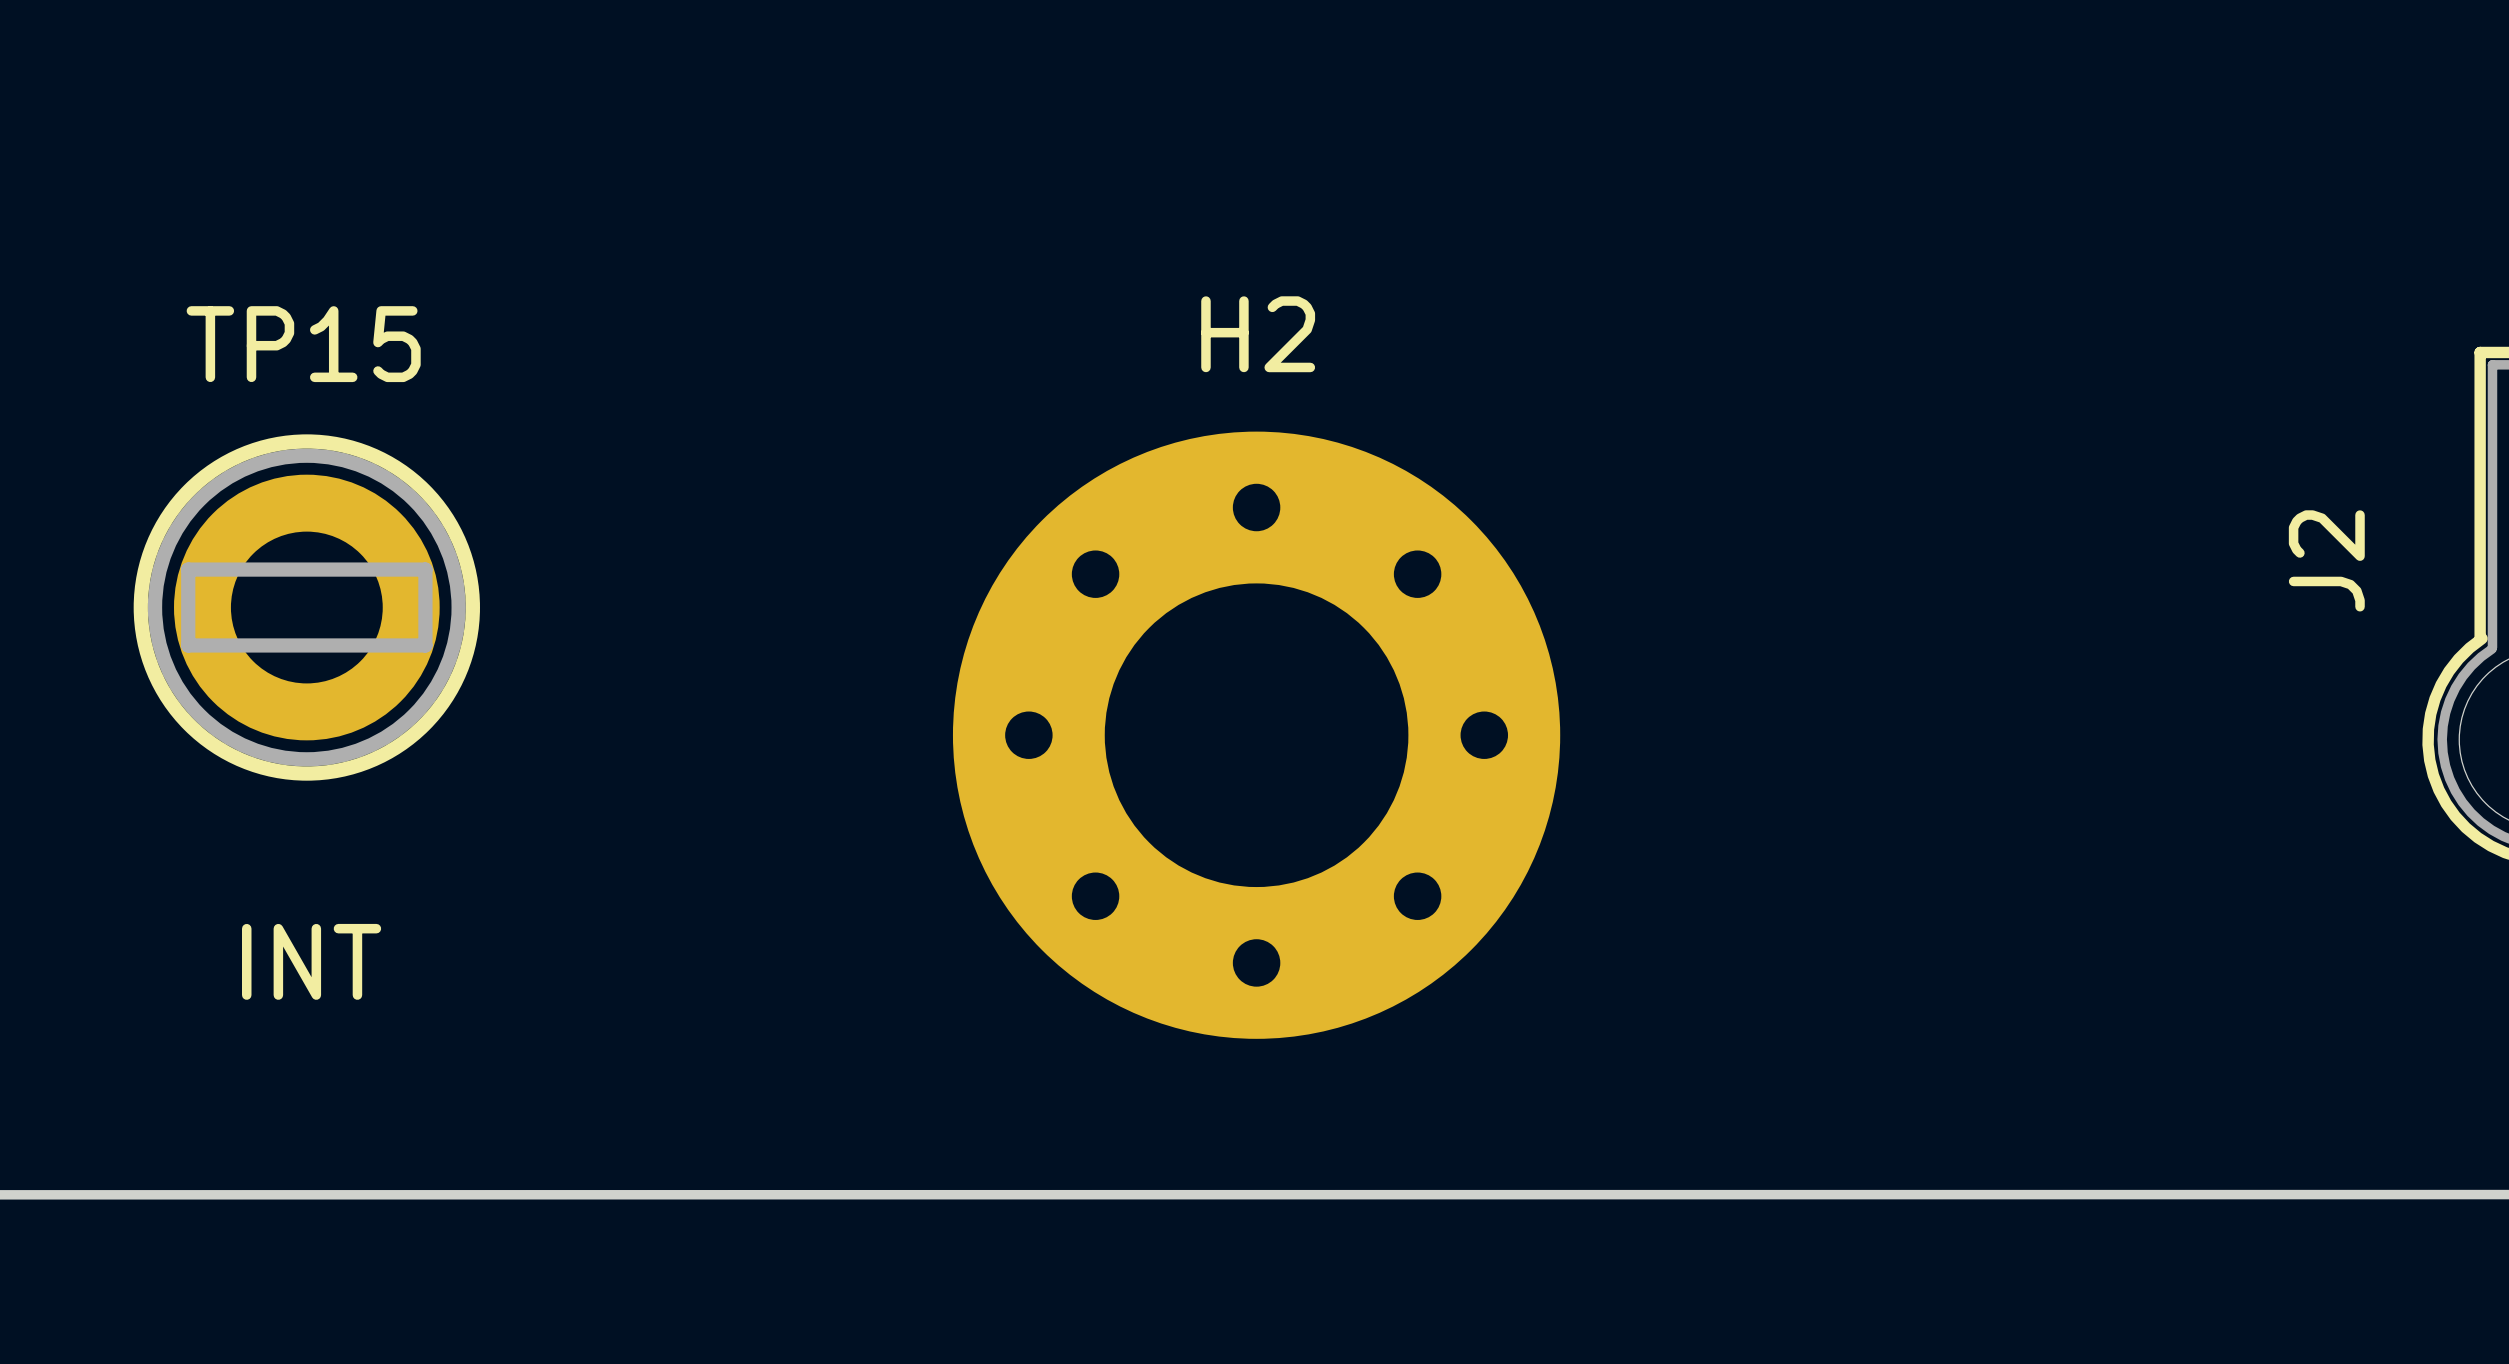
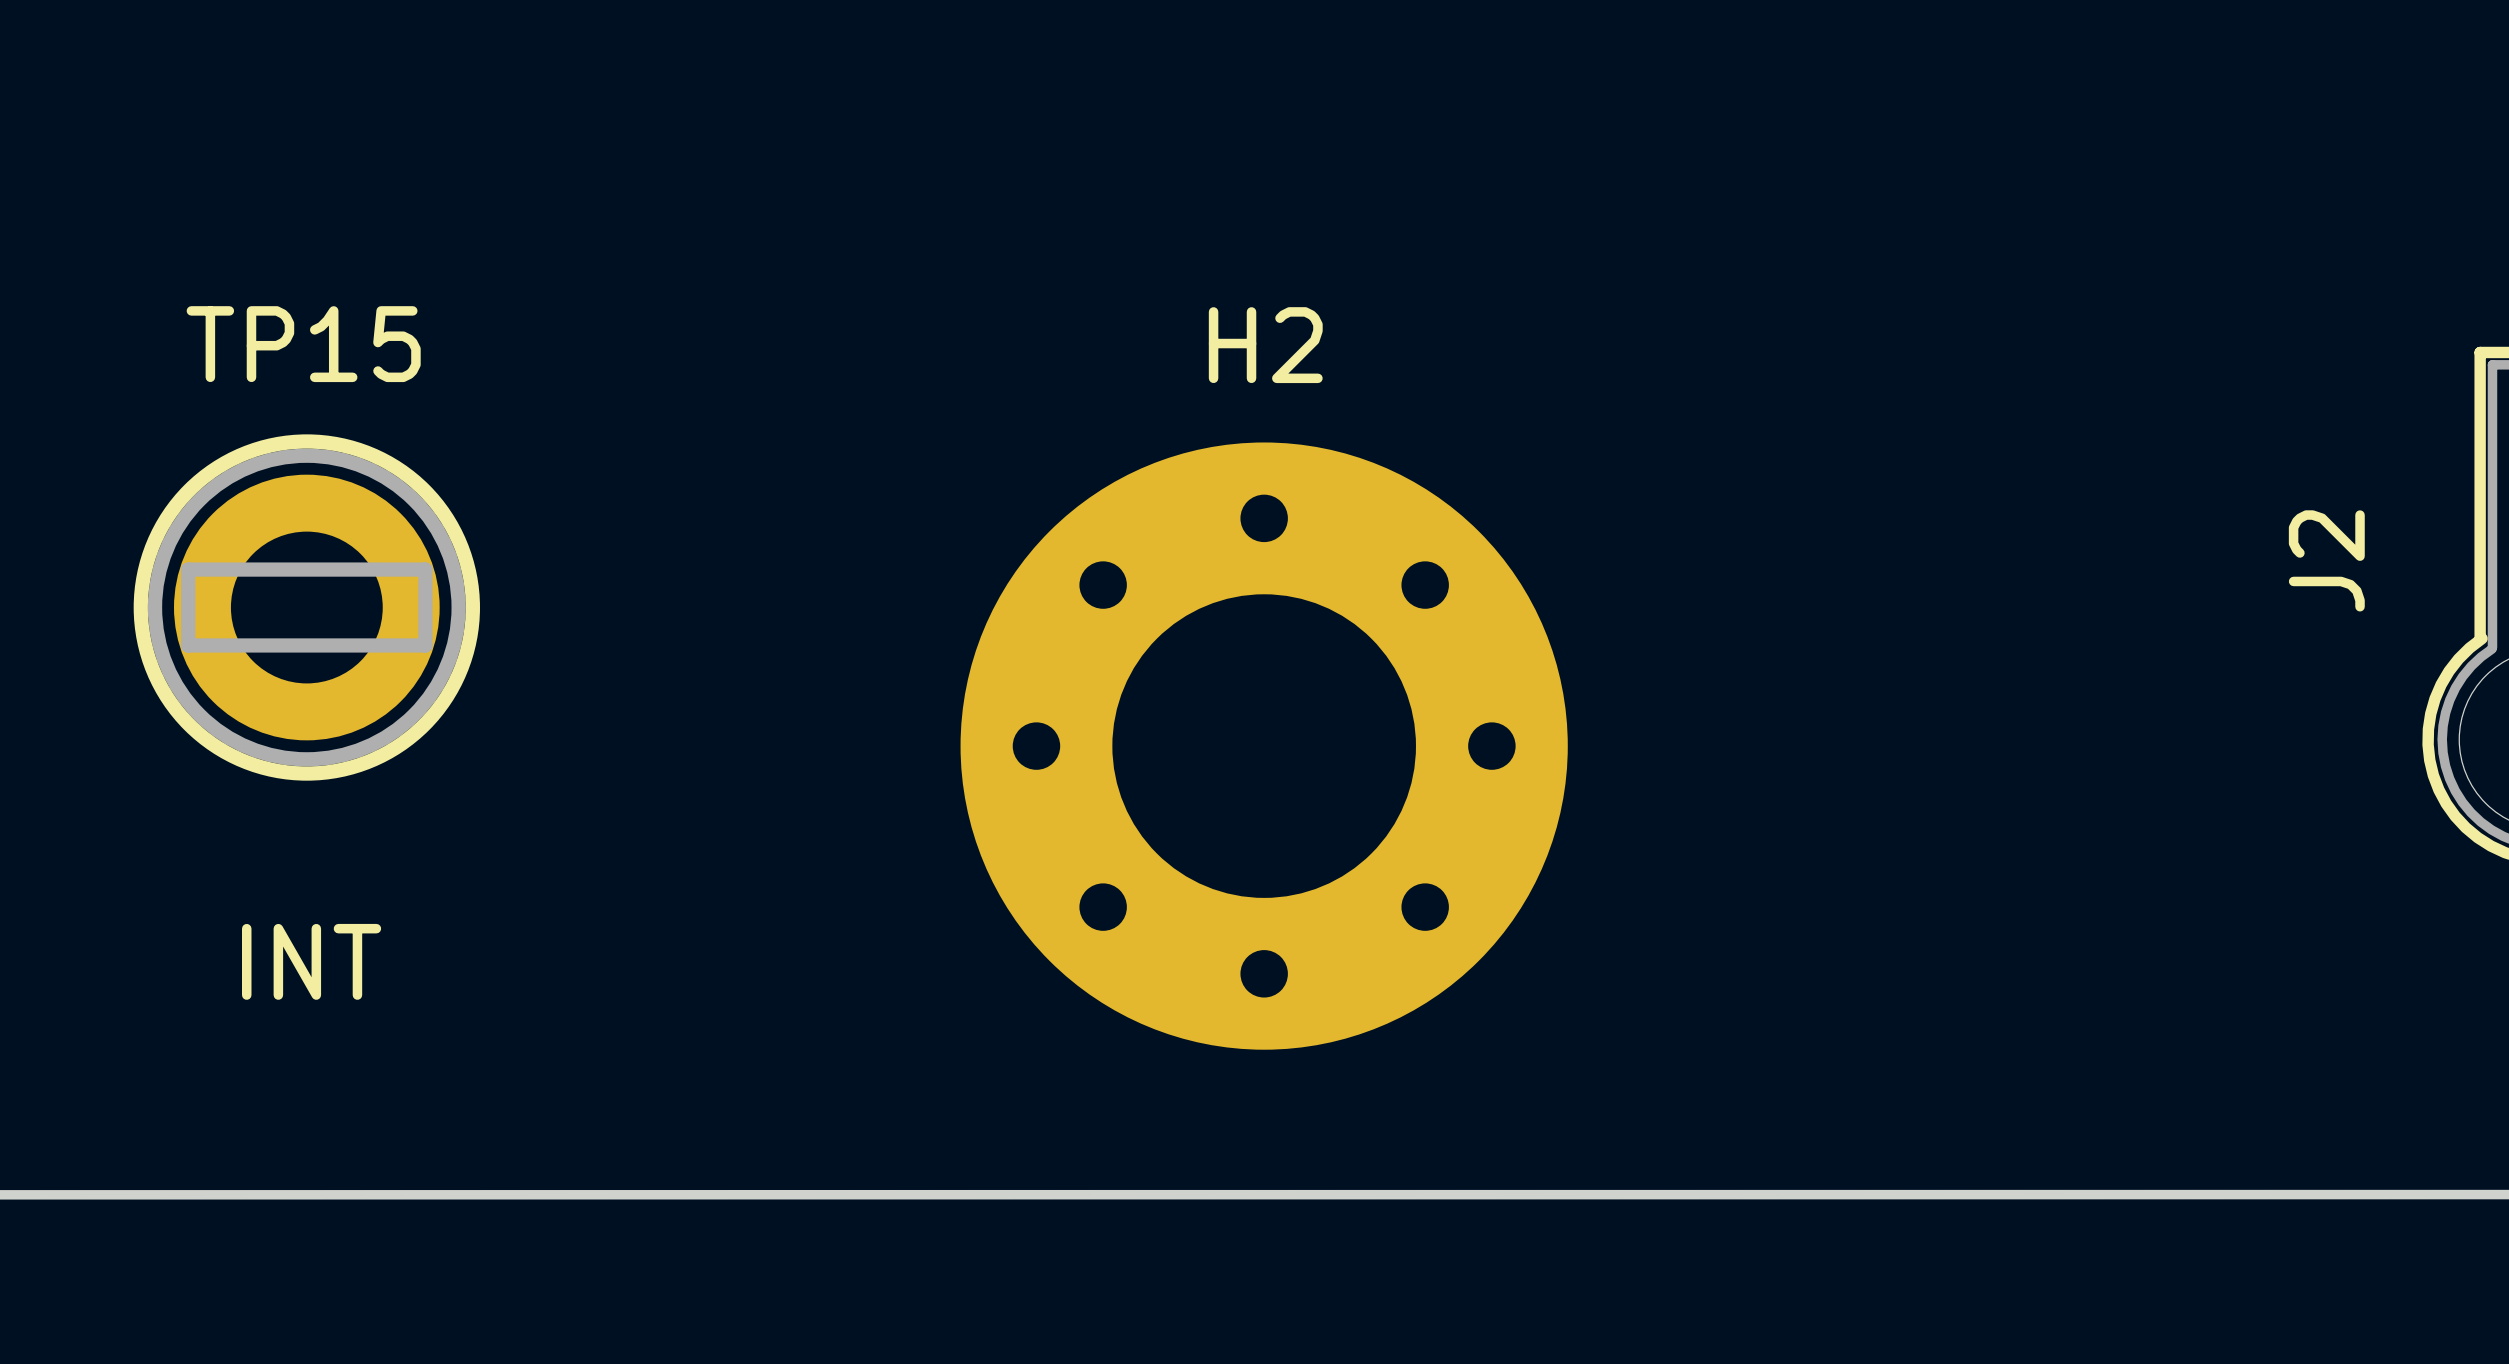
H2 position: (1256, 735) -> (1264, 746)

